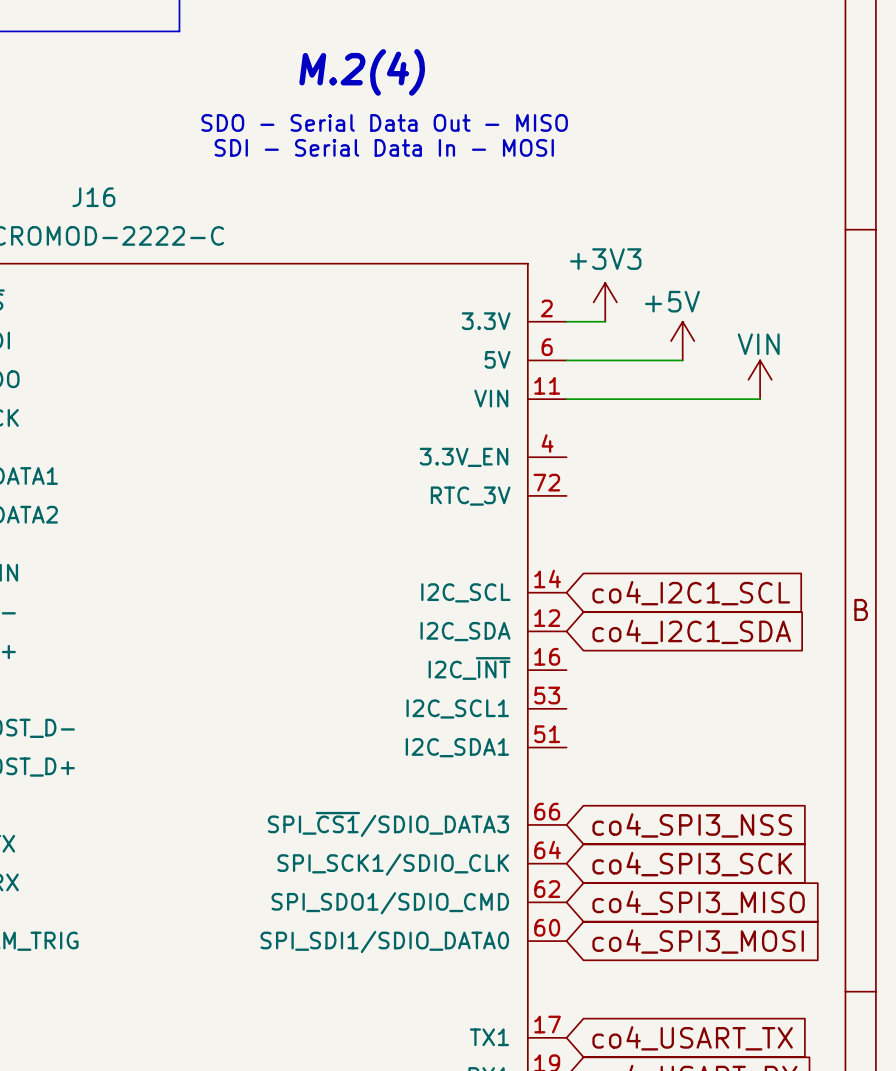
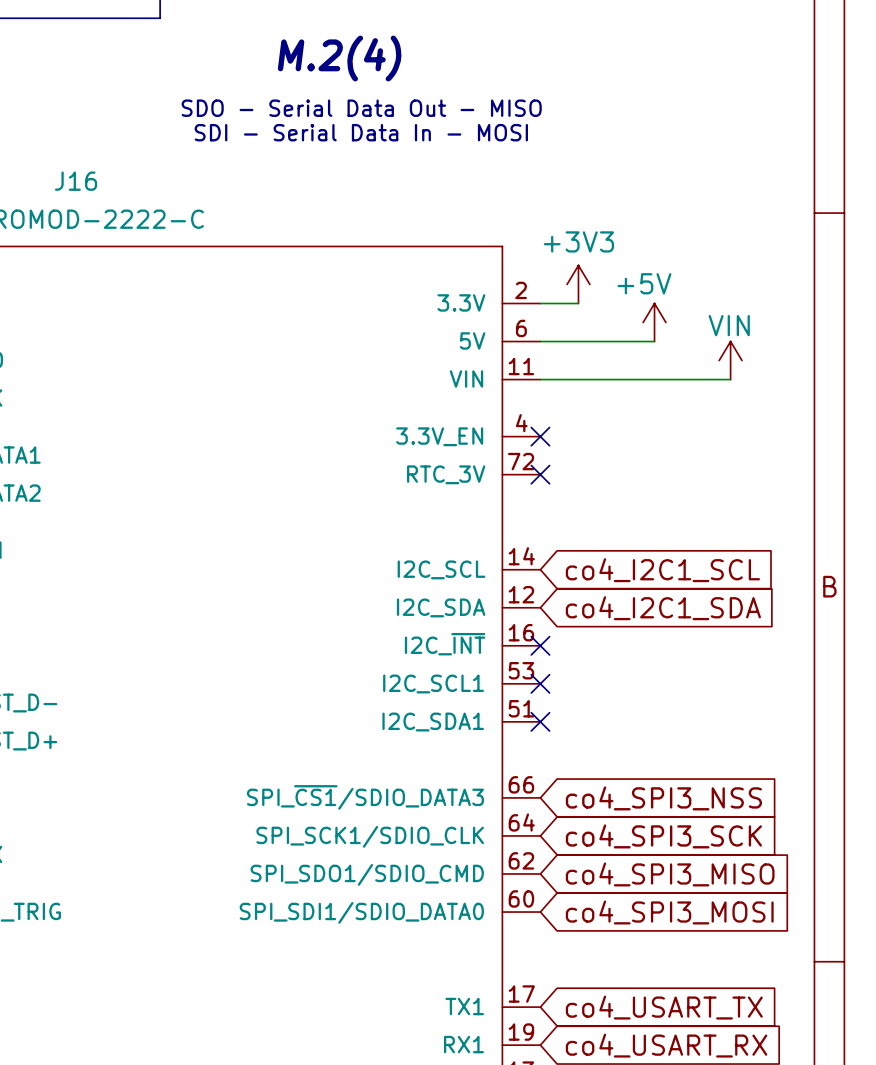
no-connect mark: none -> (540, 436)
no-connect mark: none -> (540, 474)
no-connect mark: none -> (540, 645)
no-connect mark: none -> (540, 683)
no-connect mark: none -> (540, 721)

